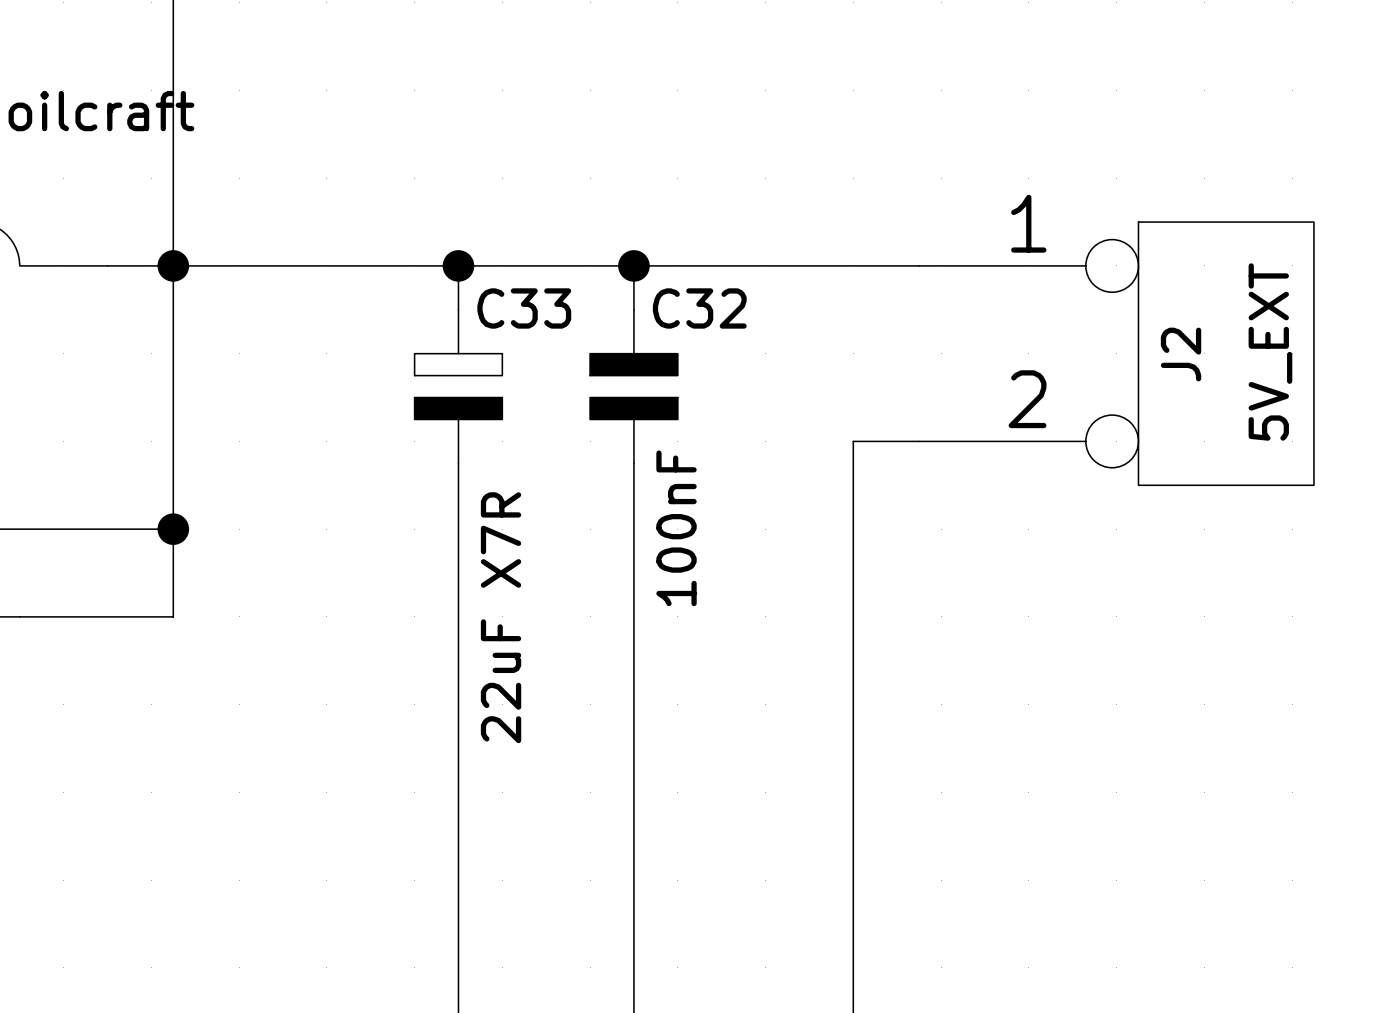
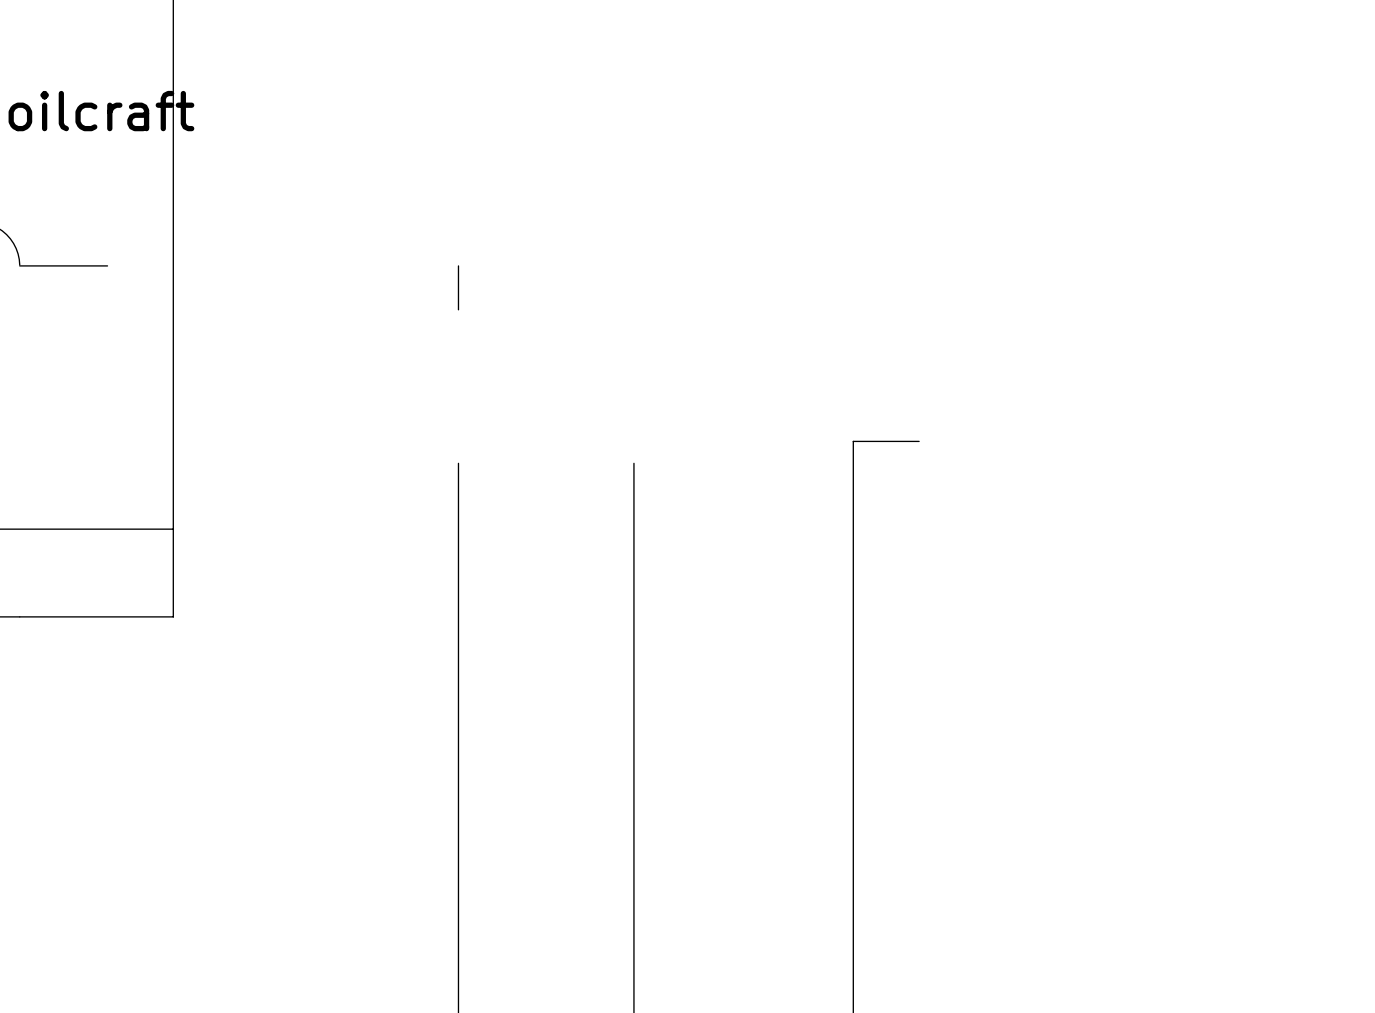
wire: (107, 265) (919, 265) -> none
junction: (173, 265) -> none
junction: (458, 265) -> none
wire: (633, 265) (633, 309) -> none
junction: (633, 265) -> none
J2: 5V_EXT (1116, 353) -> none
C33: 22uF X7R (458, 386) -> none
C32: 100nF (633, 386) -> none
junction: (173, 529) -> none

